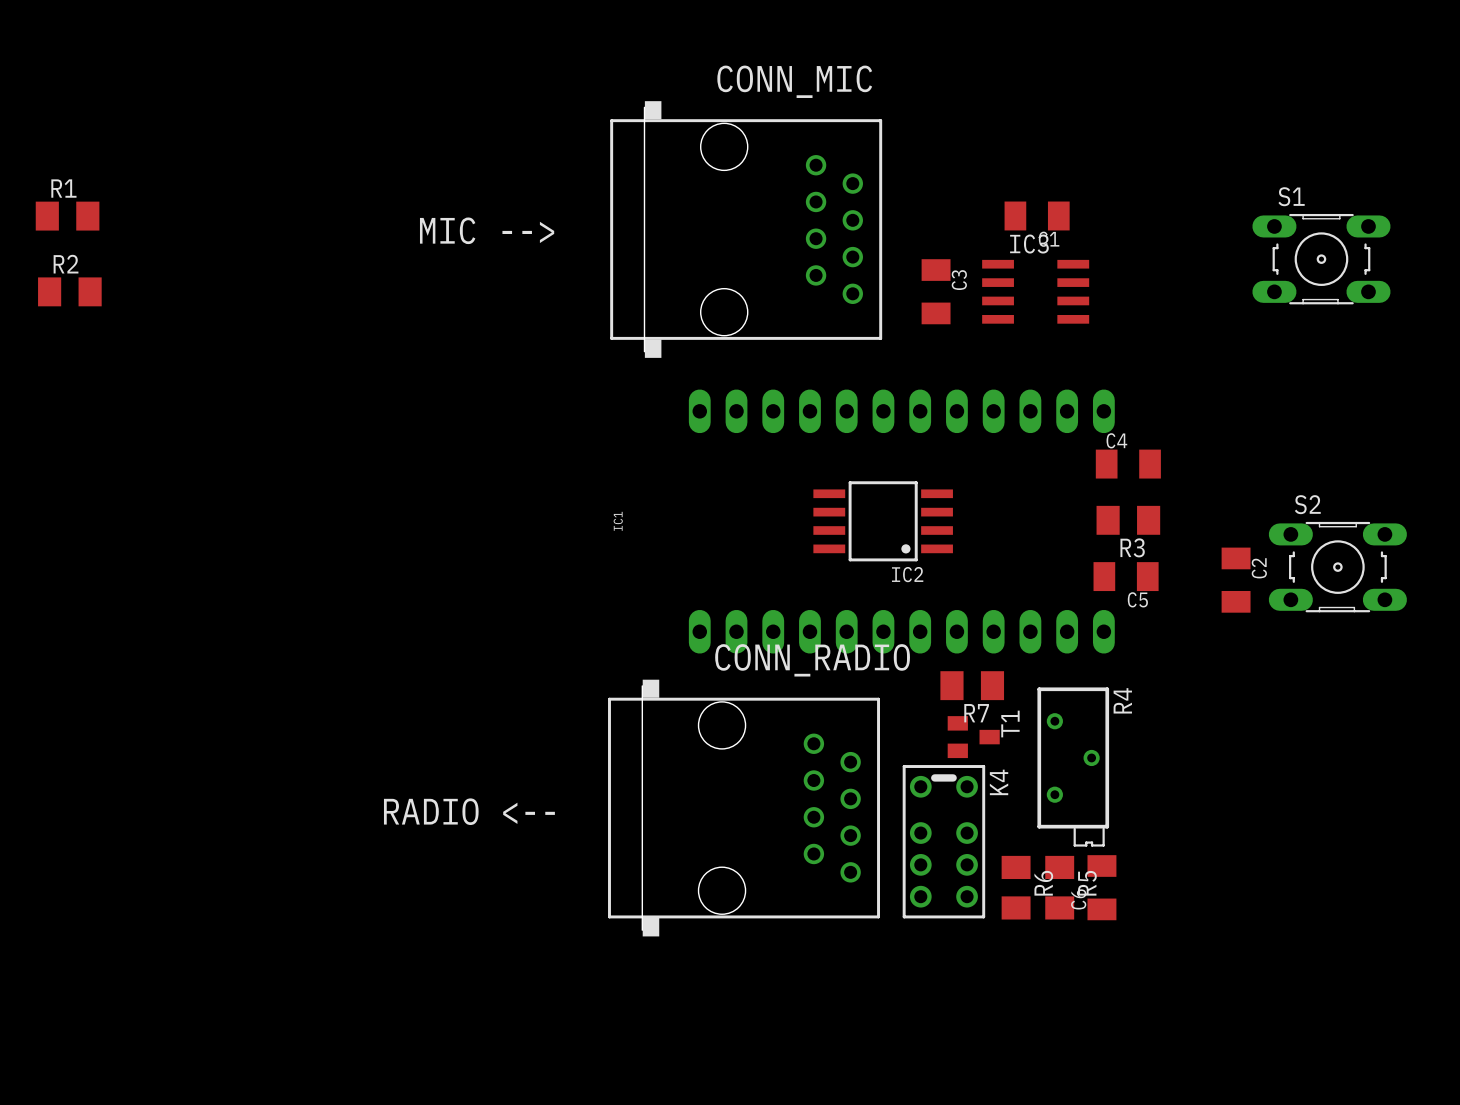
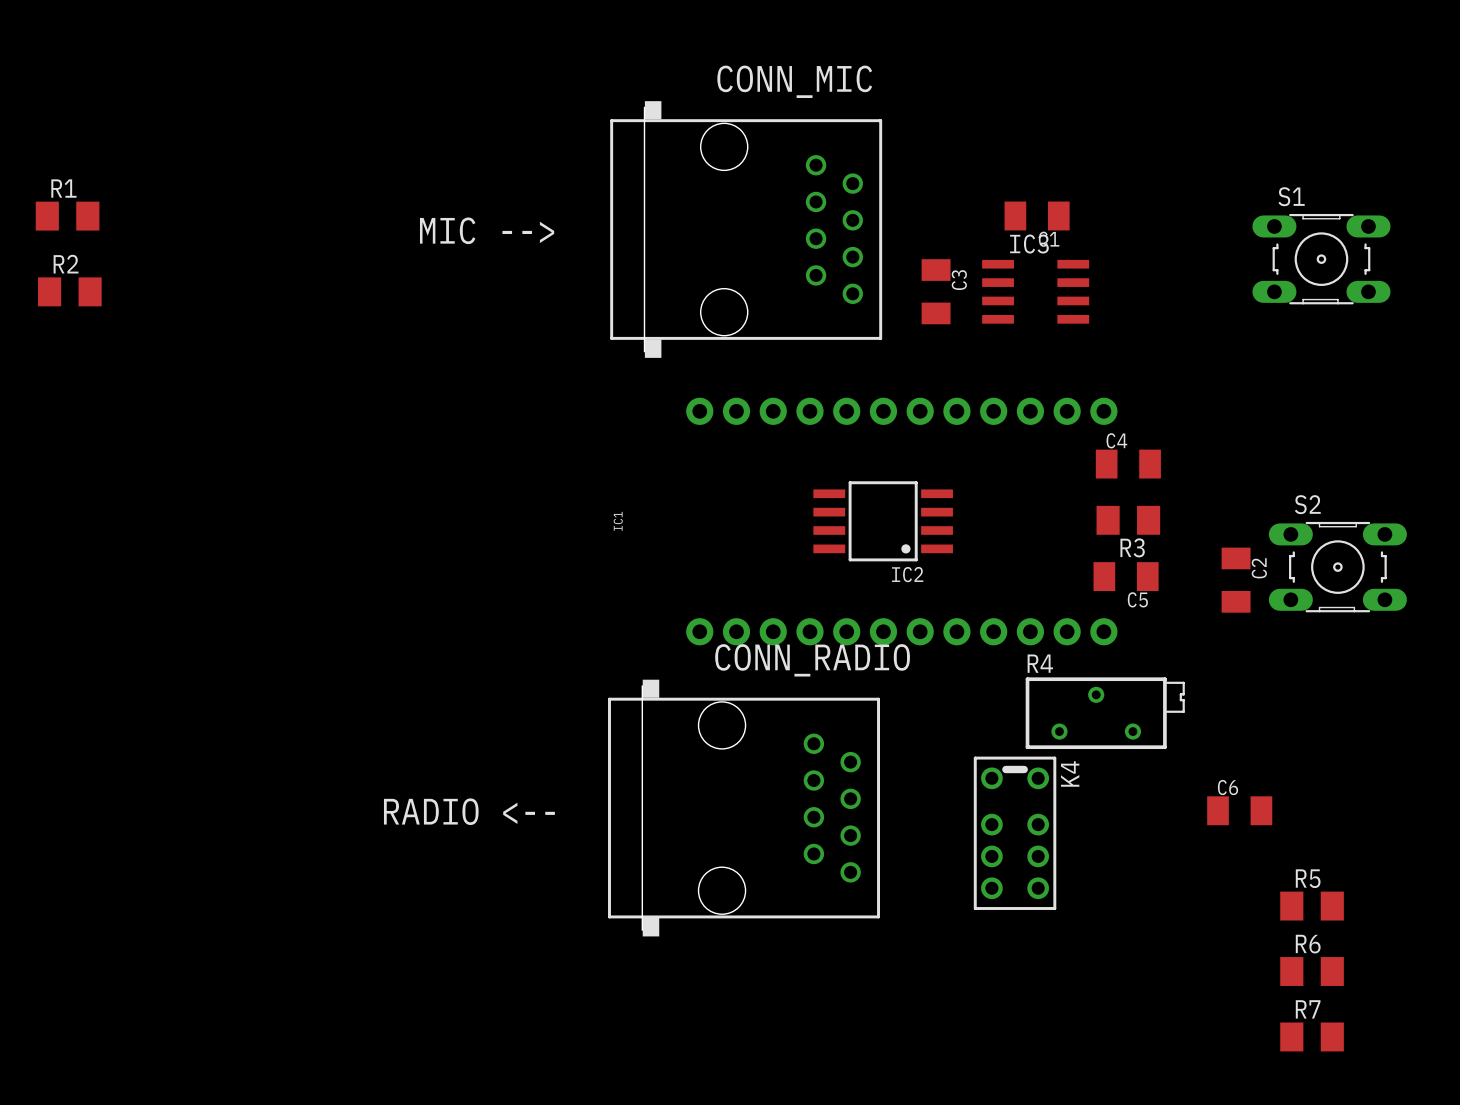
IC1 footprint: [688, 389, 1115, 654] -> [686, 397, 1118, 646]
R7 position: (972, 685) -> (1312, 1036)
R7 name position: R7 (976, 713) -> R7 (1308, 1009)
T1: (973, 737) -> none
R4 rotation: 0° (1073, 767) -> 90° counterclockwise (1105, 713)
K4 position: (943, 841) -> (1015, 833)
R6 name position: R6 (1043, 883) -> R6 (1308, 944)
R5 name position: R5 (1087, 883) -> R5 (1308, 878)
R6 rotation: 0° (1016, 887) -> 90° clockwise (1312, 971)
R6 position: (1016, 887) -> (1312, 971)
R5 rotation: 0° (1059, 887) -> 90° clockwise (1312, 906)
R5 position: (1059, 887) -> (1312, 906)
C6 rotation: 0° (1101, 887) -> 90° clockwise (1239, 810)
C6 position: (1101, 887) -> (1239, 810)

